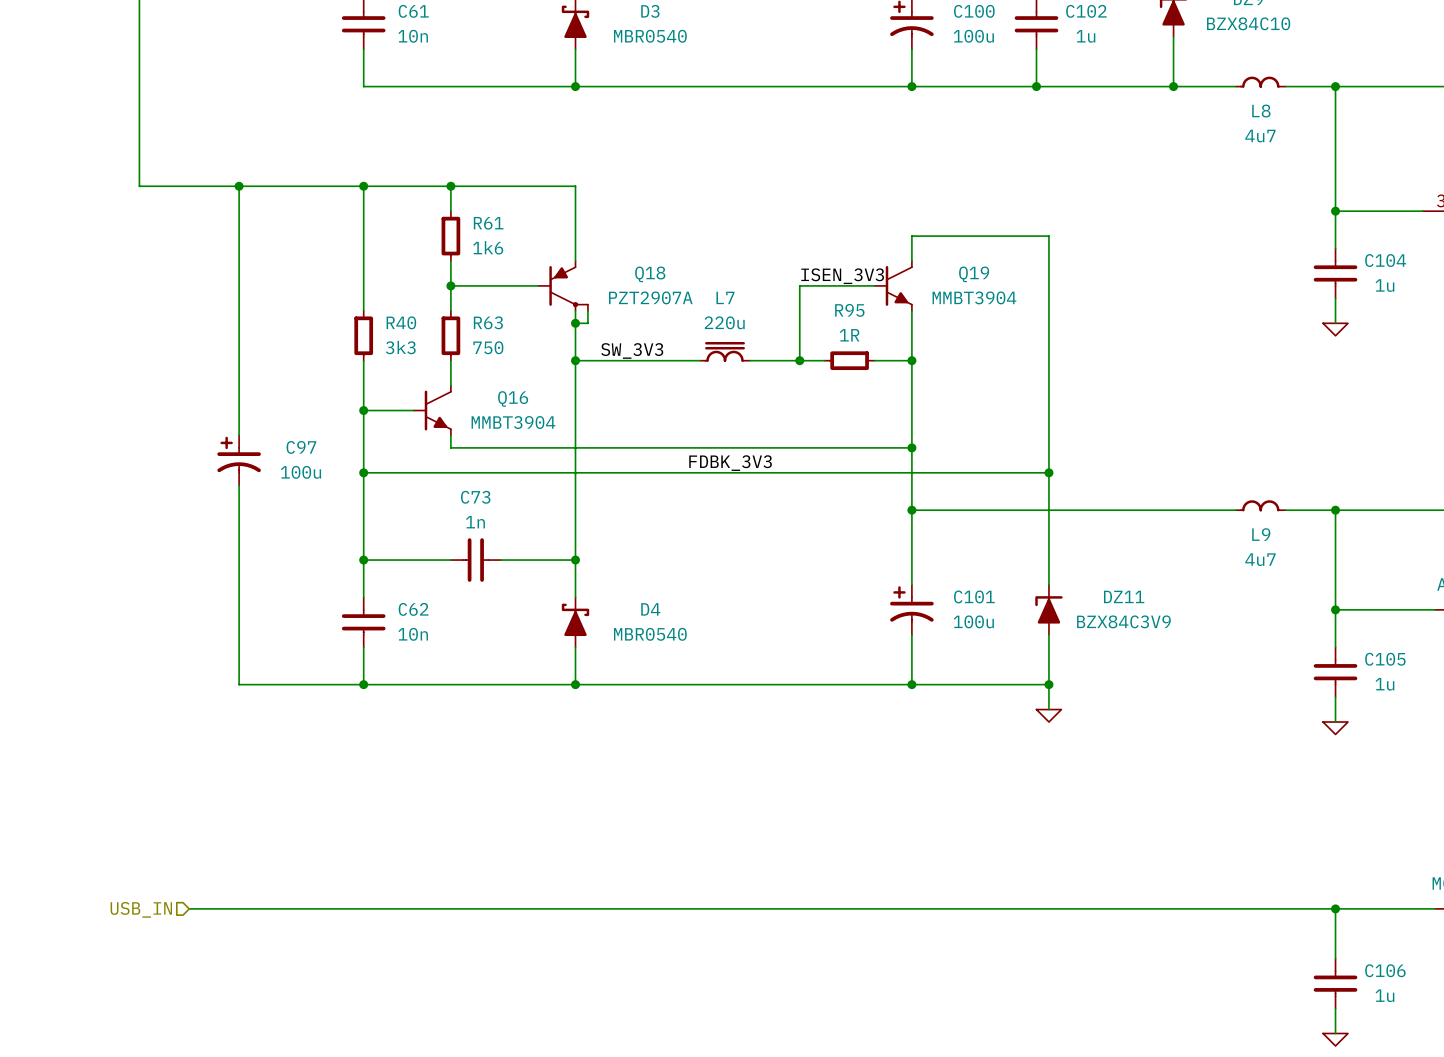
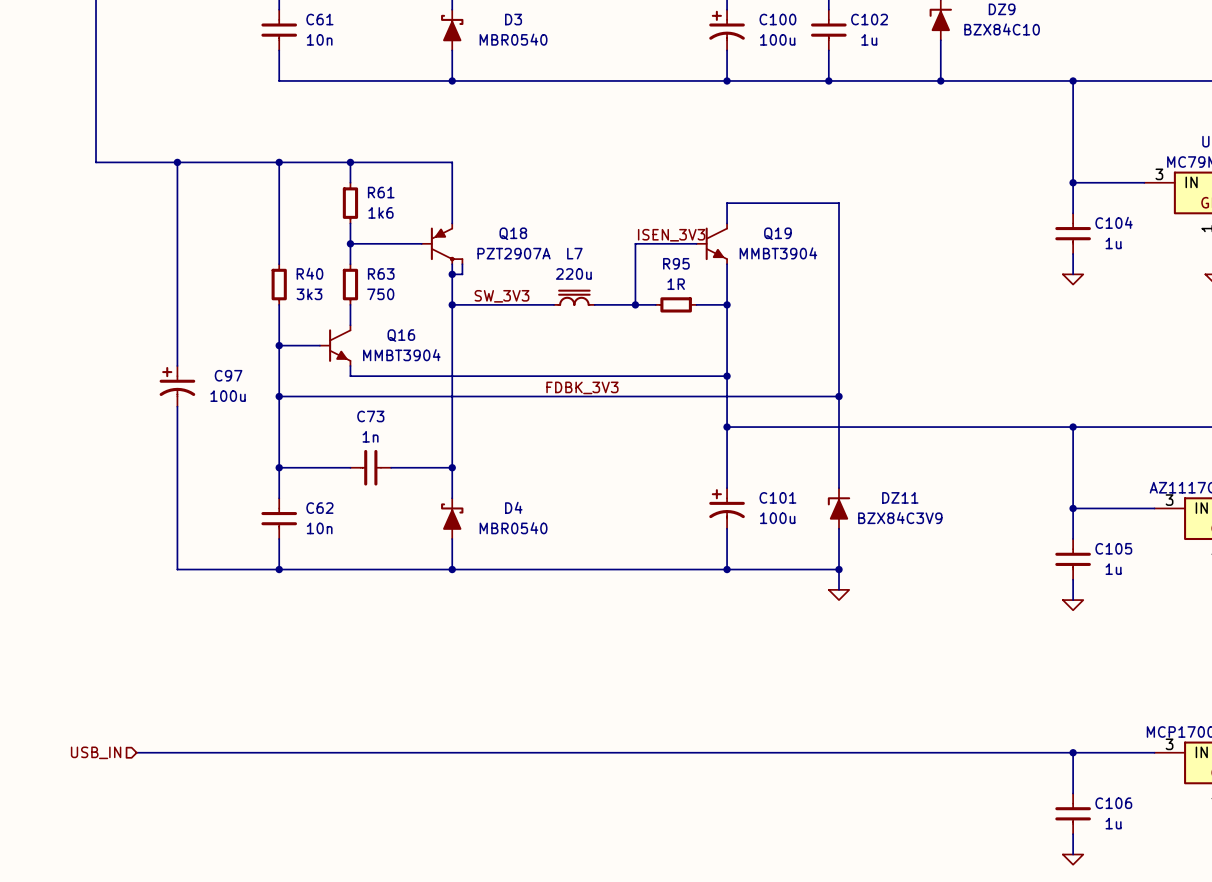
L8: 4u7 (1260, 82) -> none
wire: none -> (991, 80) (1032, 80)
L9: 4u7 (1260, 505) -> none
wire: none -> (991, 427) (1032, 427)

